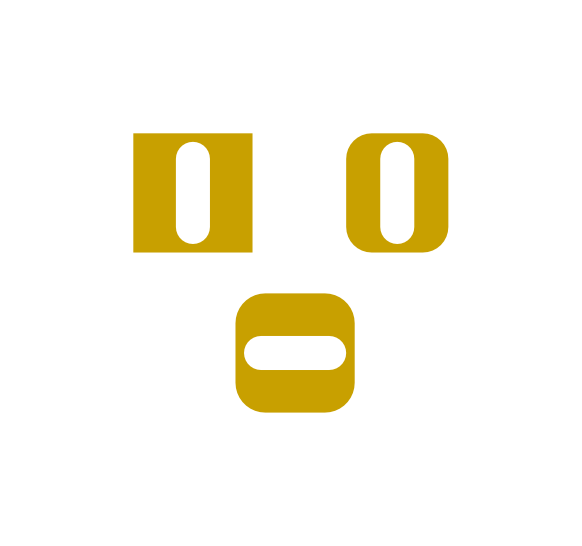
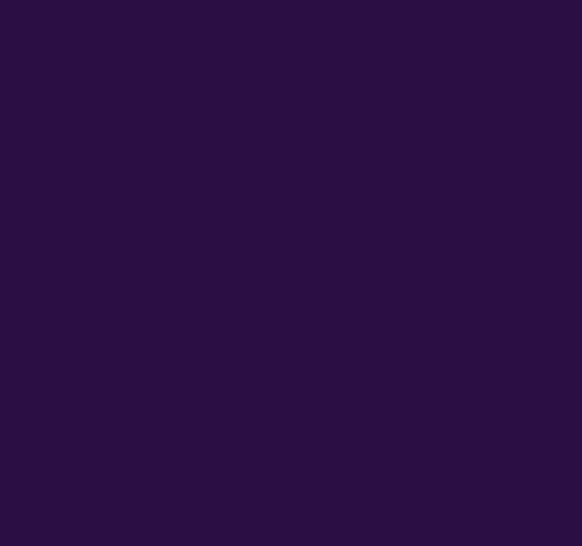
part: (290, 272) -> none

